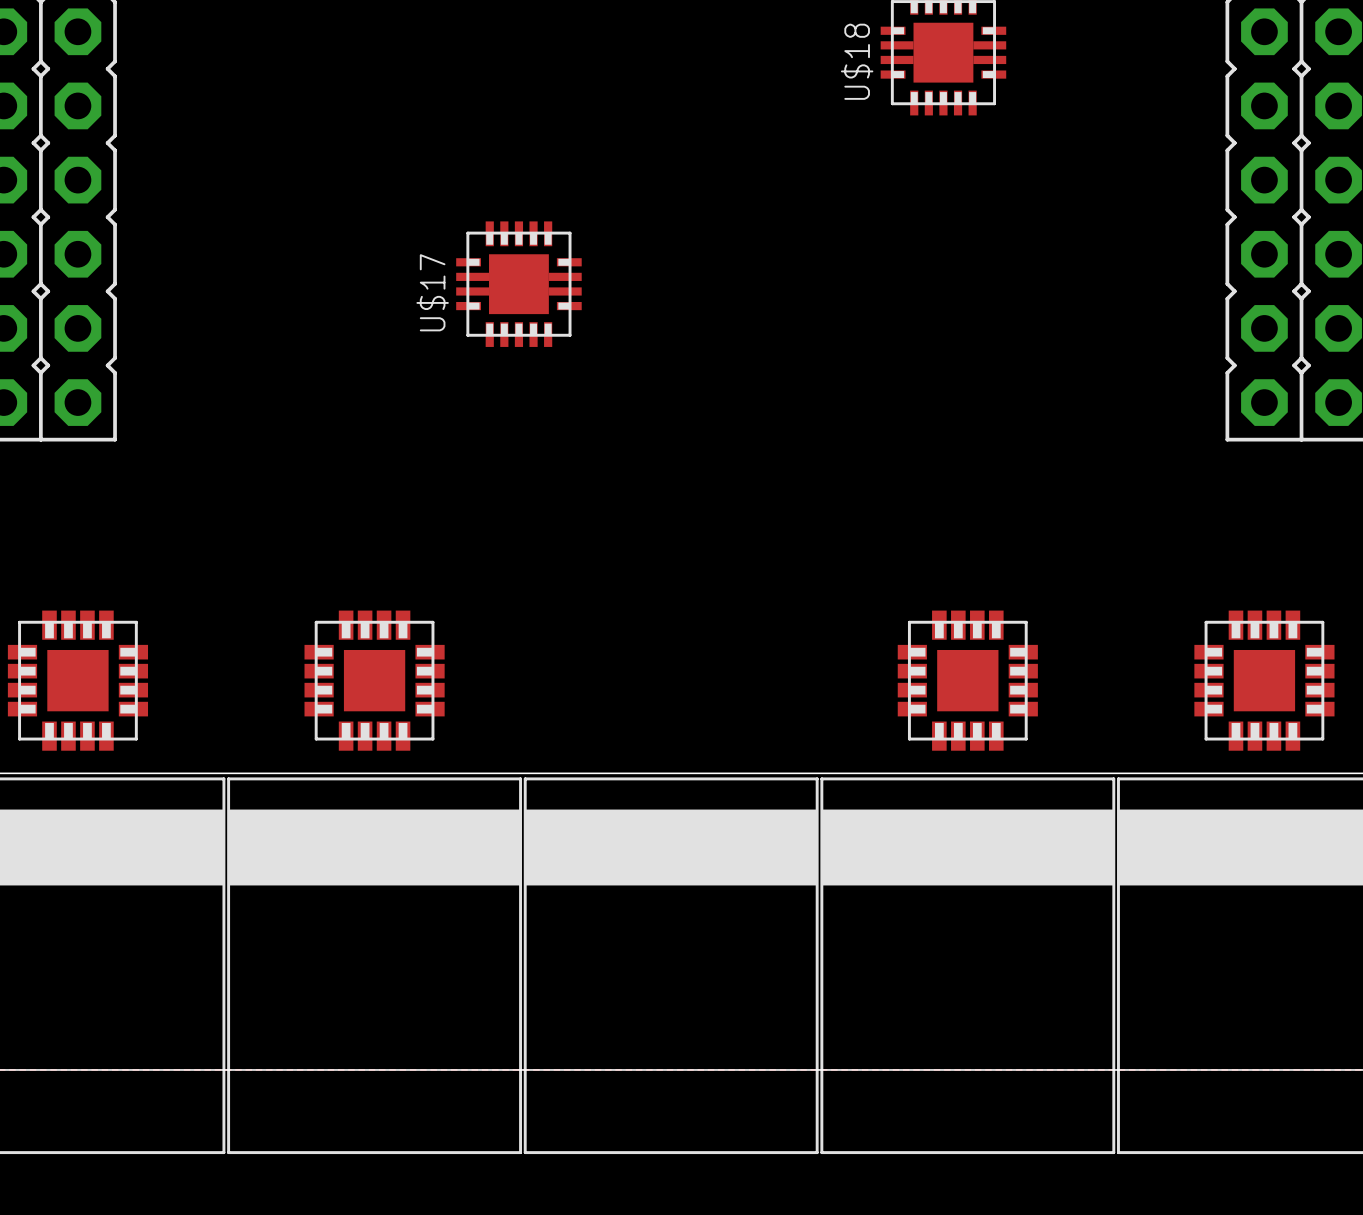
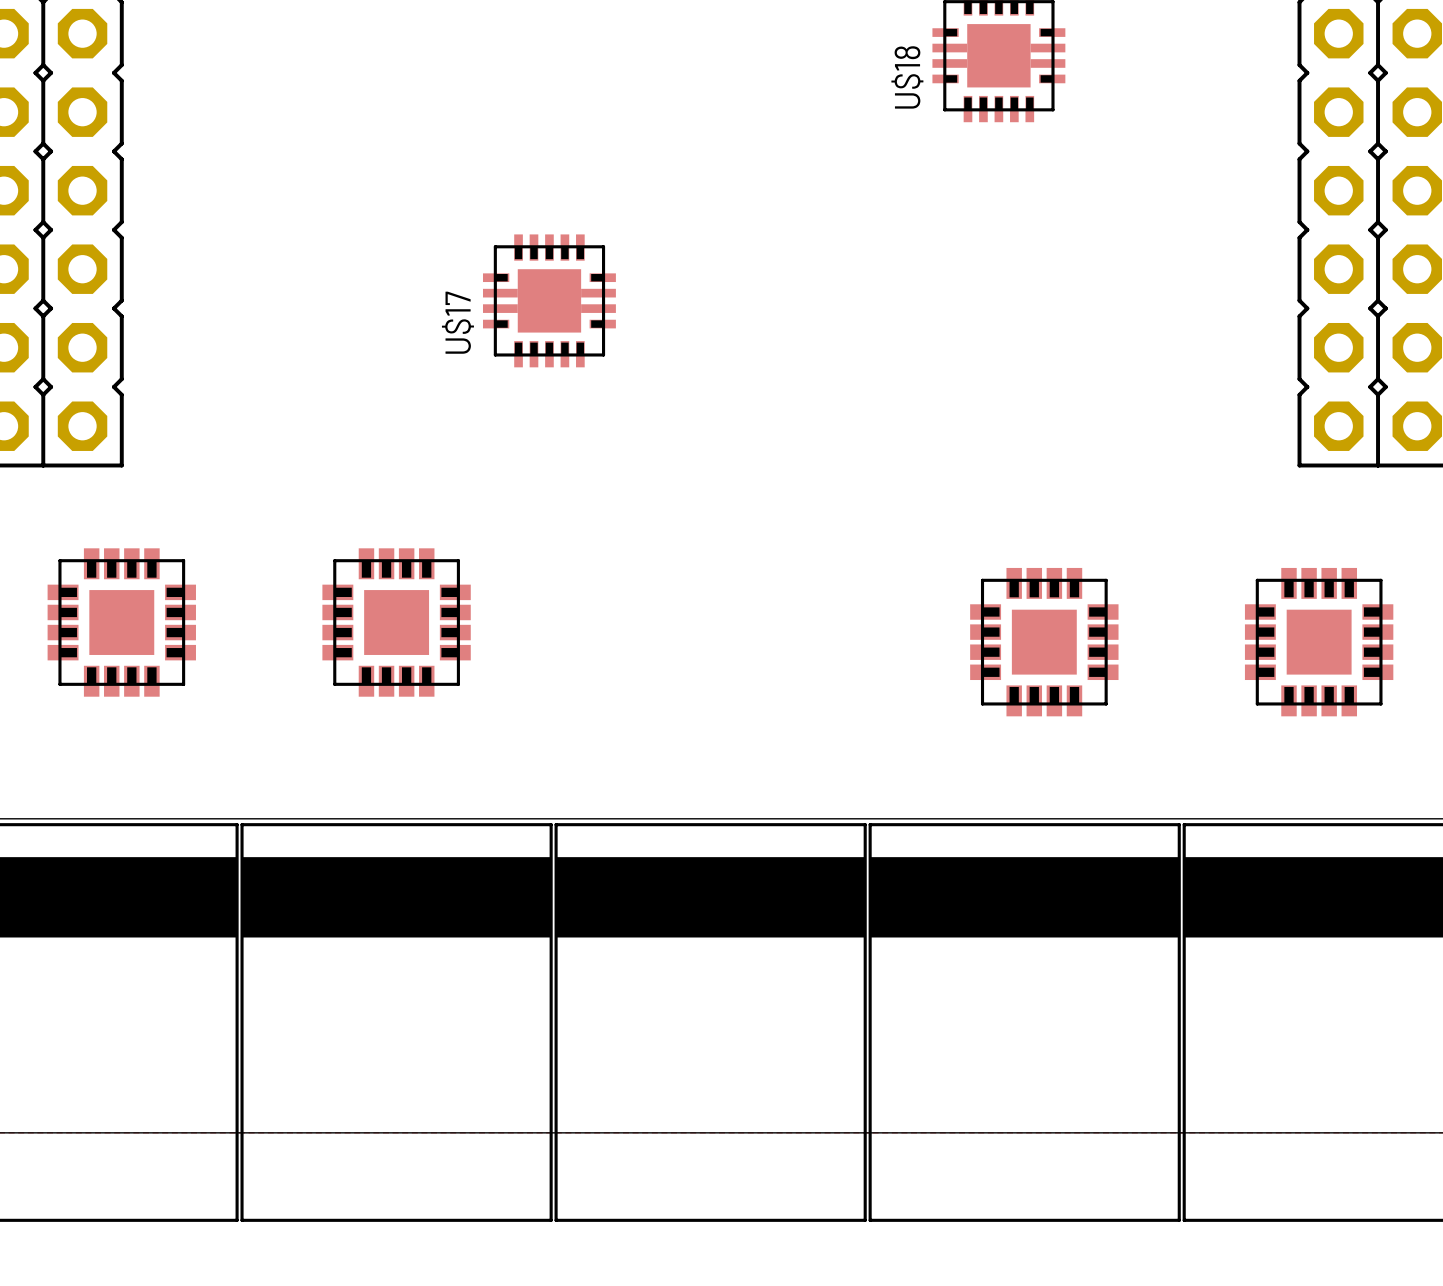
part position: (77, 680) -> (121, 622)
part position: (374, 680) -> (396, 622)
part position: (967, 680) -> (1044, 642)
part position: (1264, 680) -> (1319, 642)

